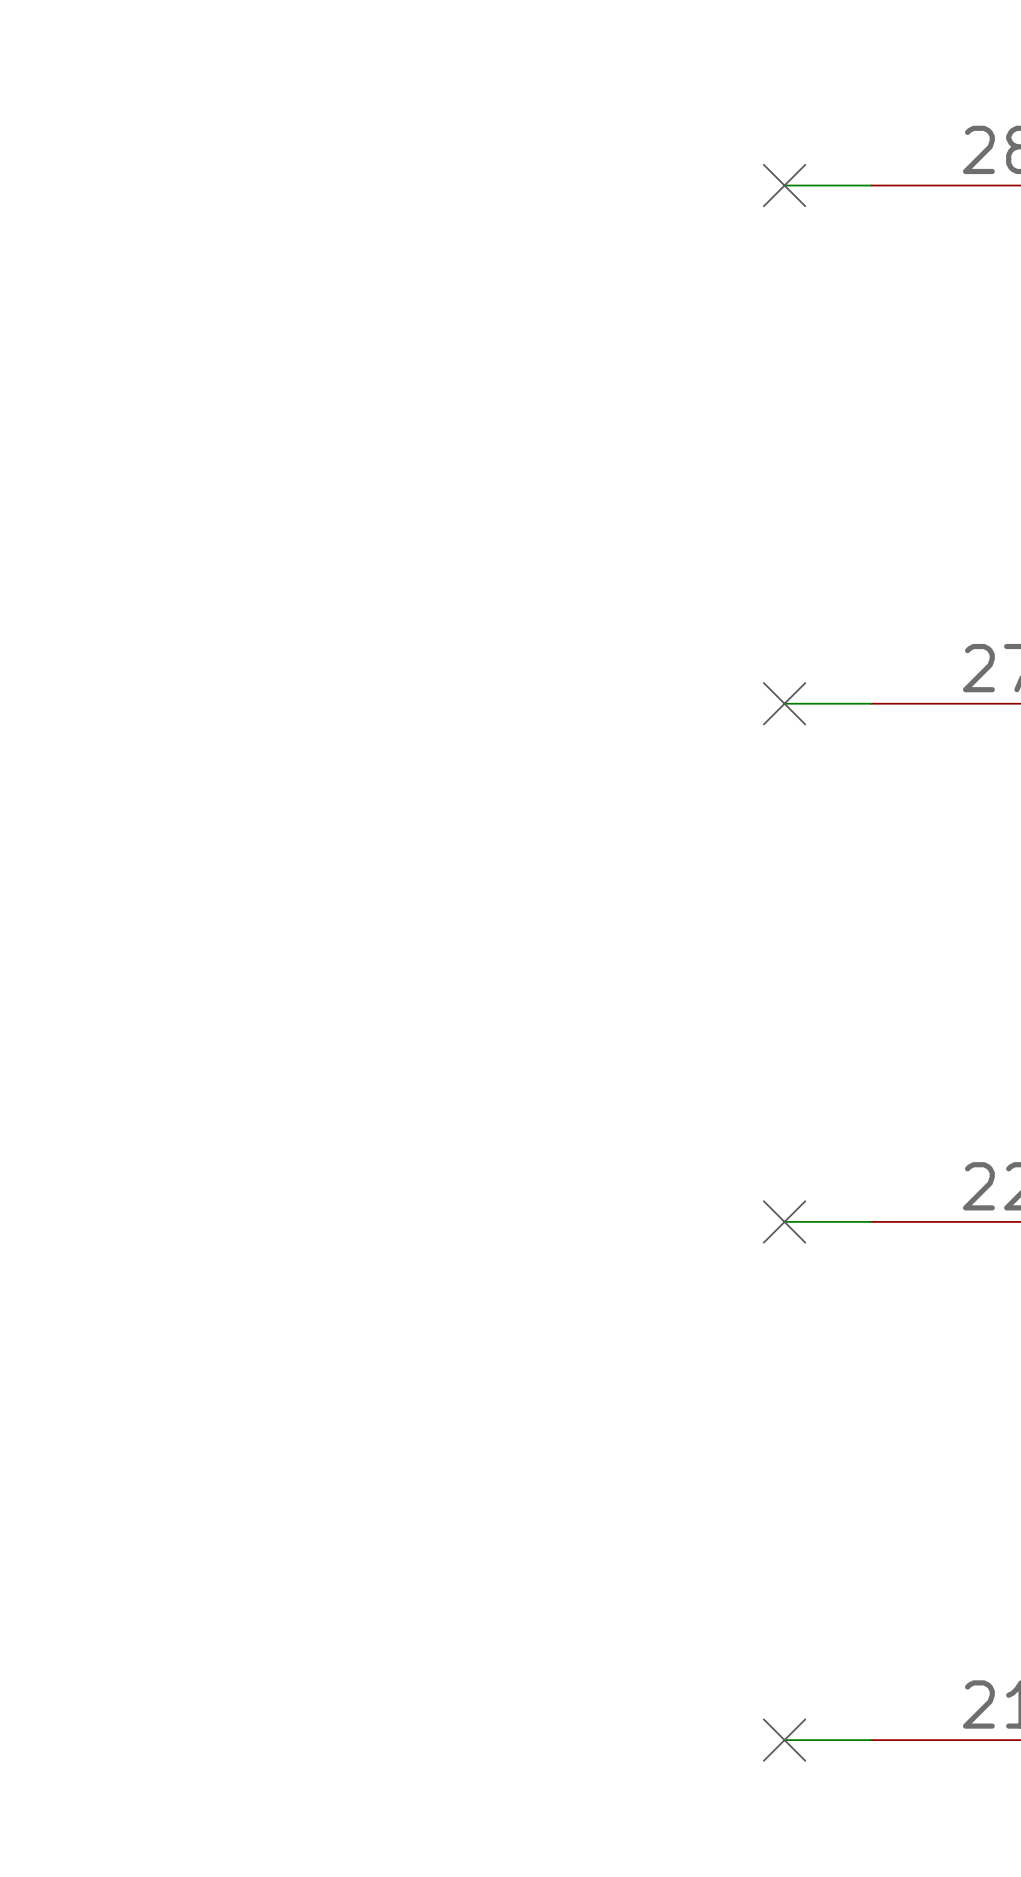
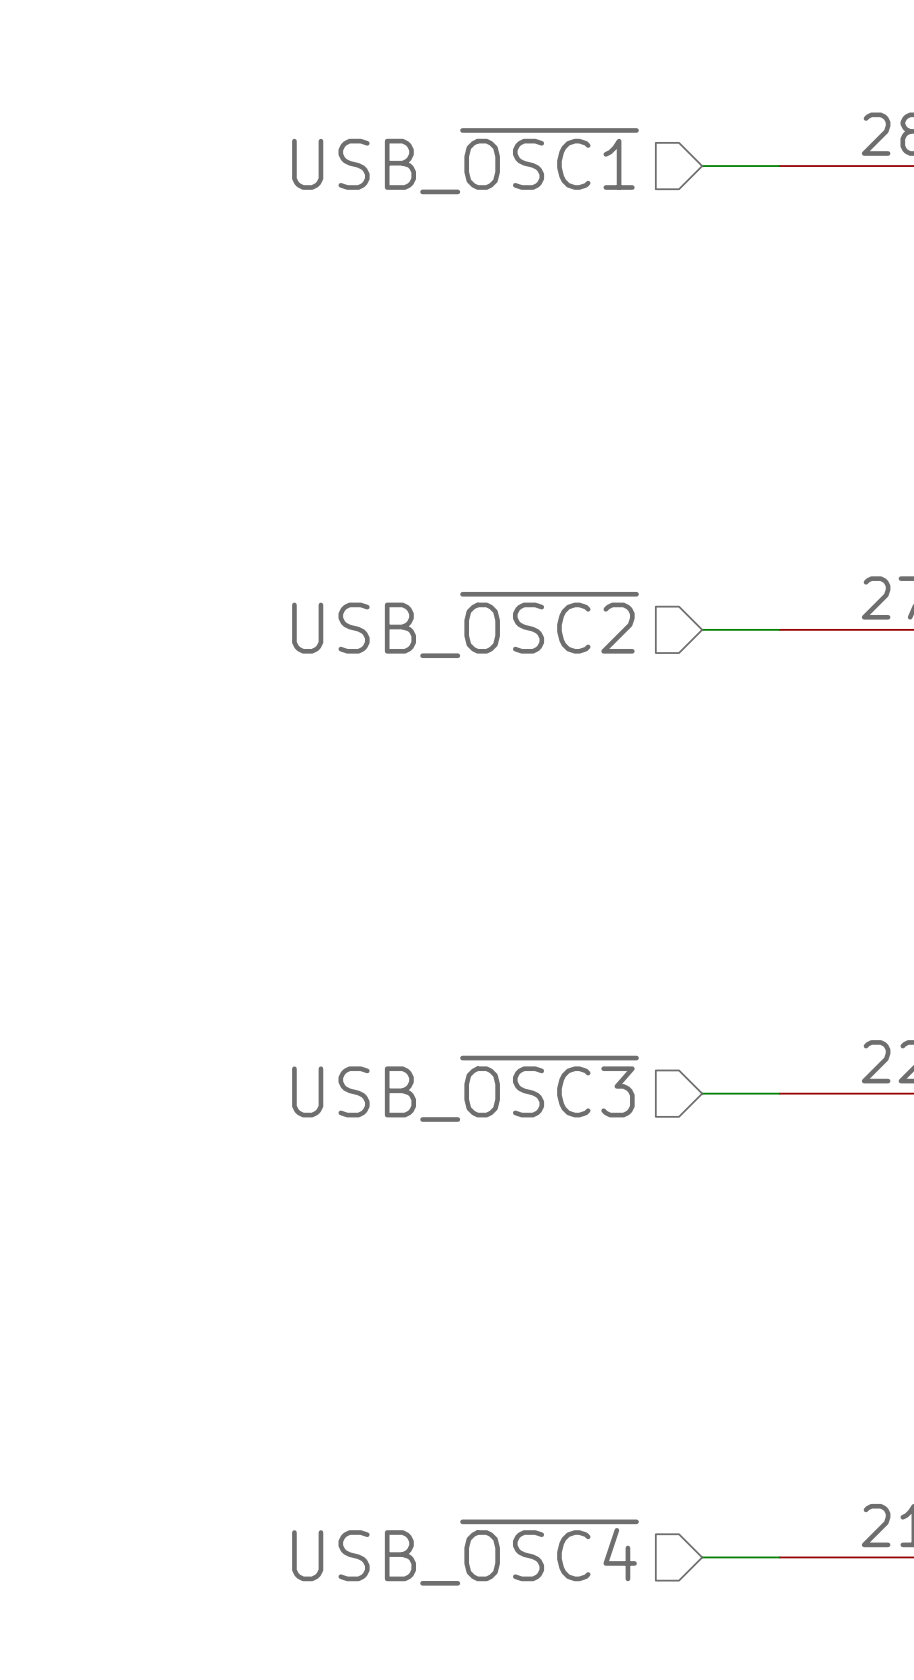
hierarchical label: none -> USB_~{OSC1} (465, 161)
no-connect mark: (784, 185) -> none
hierarchical label: none -> USB_~{OSC2} (465, 624)
no-connect mark: (784, 703) -> none
hierarchical label: none -> USB_~{OSC3} (465, 1088)
no-connect mark: (784, 1221) -> none
hierarchical label: none -> USB_~{OSC4} (465, 1552)
no-connect mark: (784, 1740) -> none

